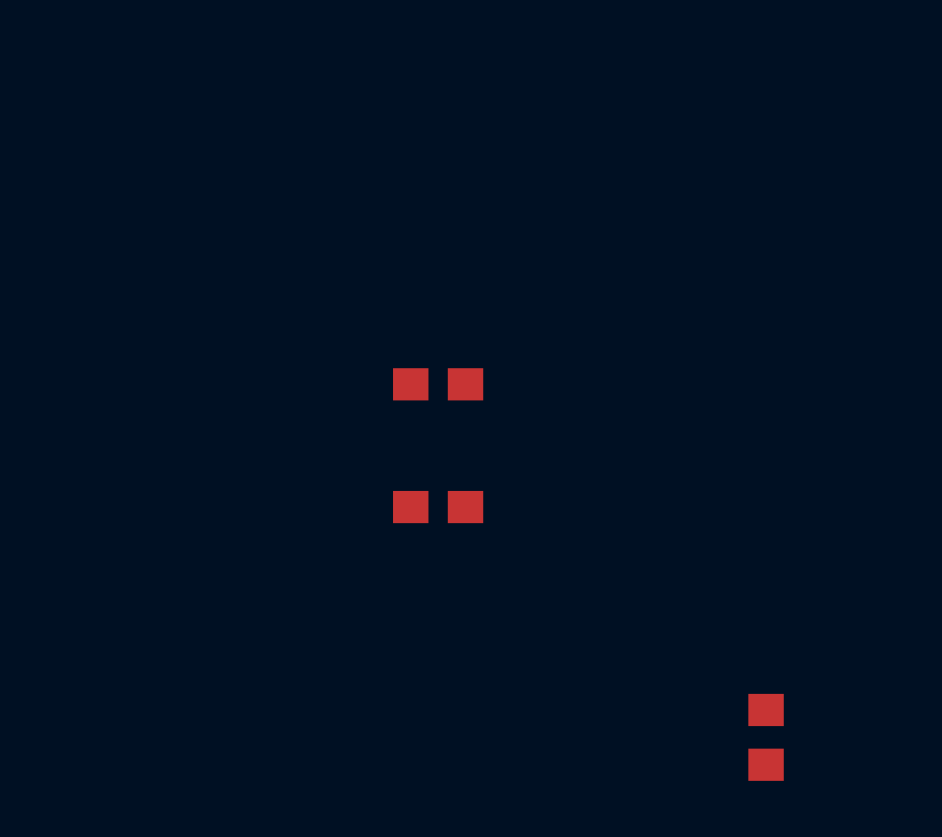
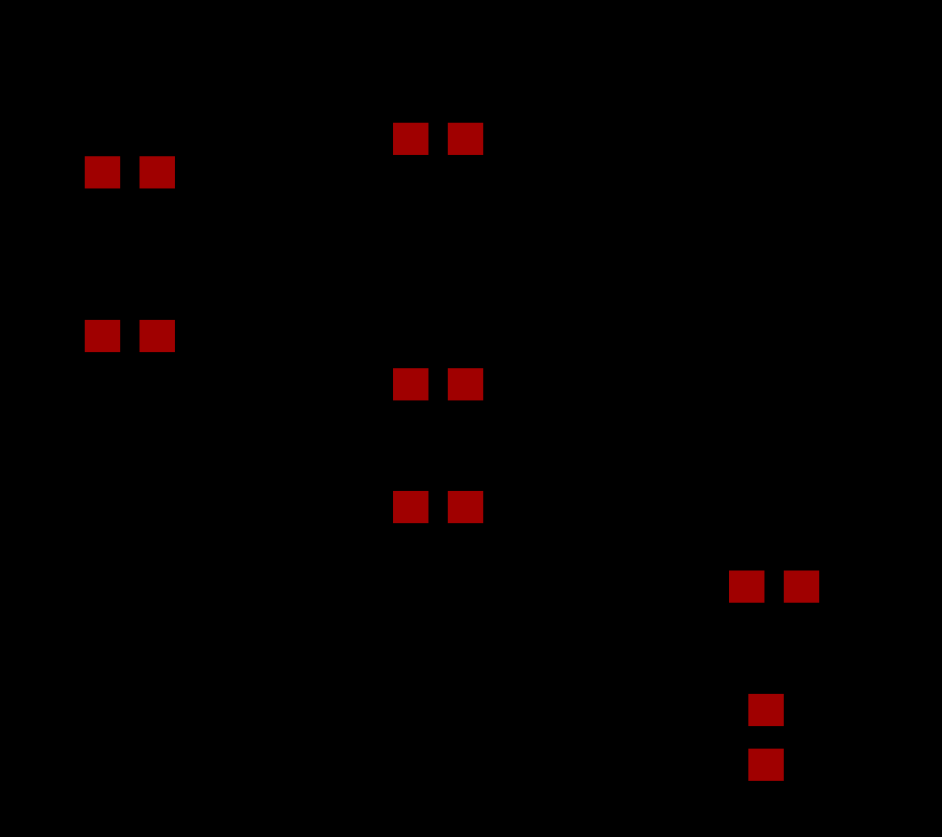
part: none -> (438, 138)
part: none -> (129, 172)
part: none -> (129, 335)
part: none -> (774, 586)

